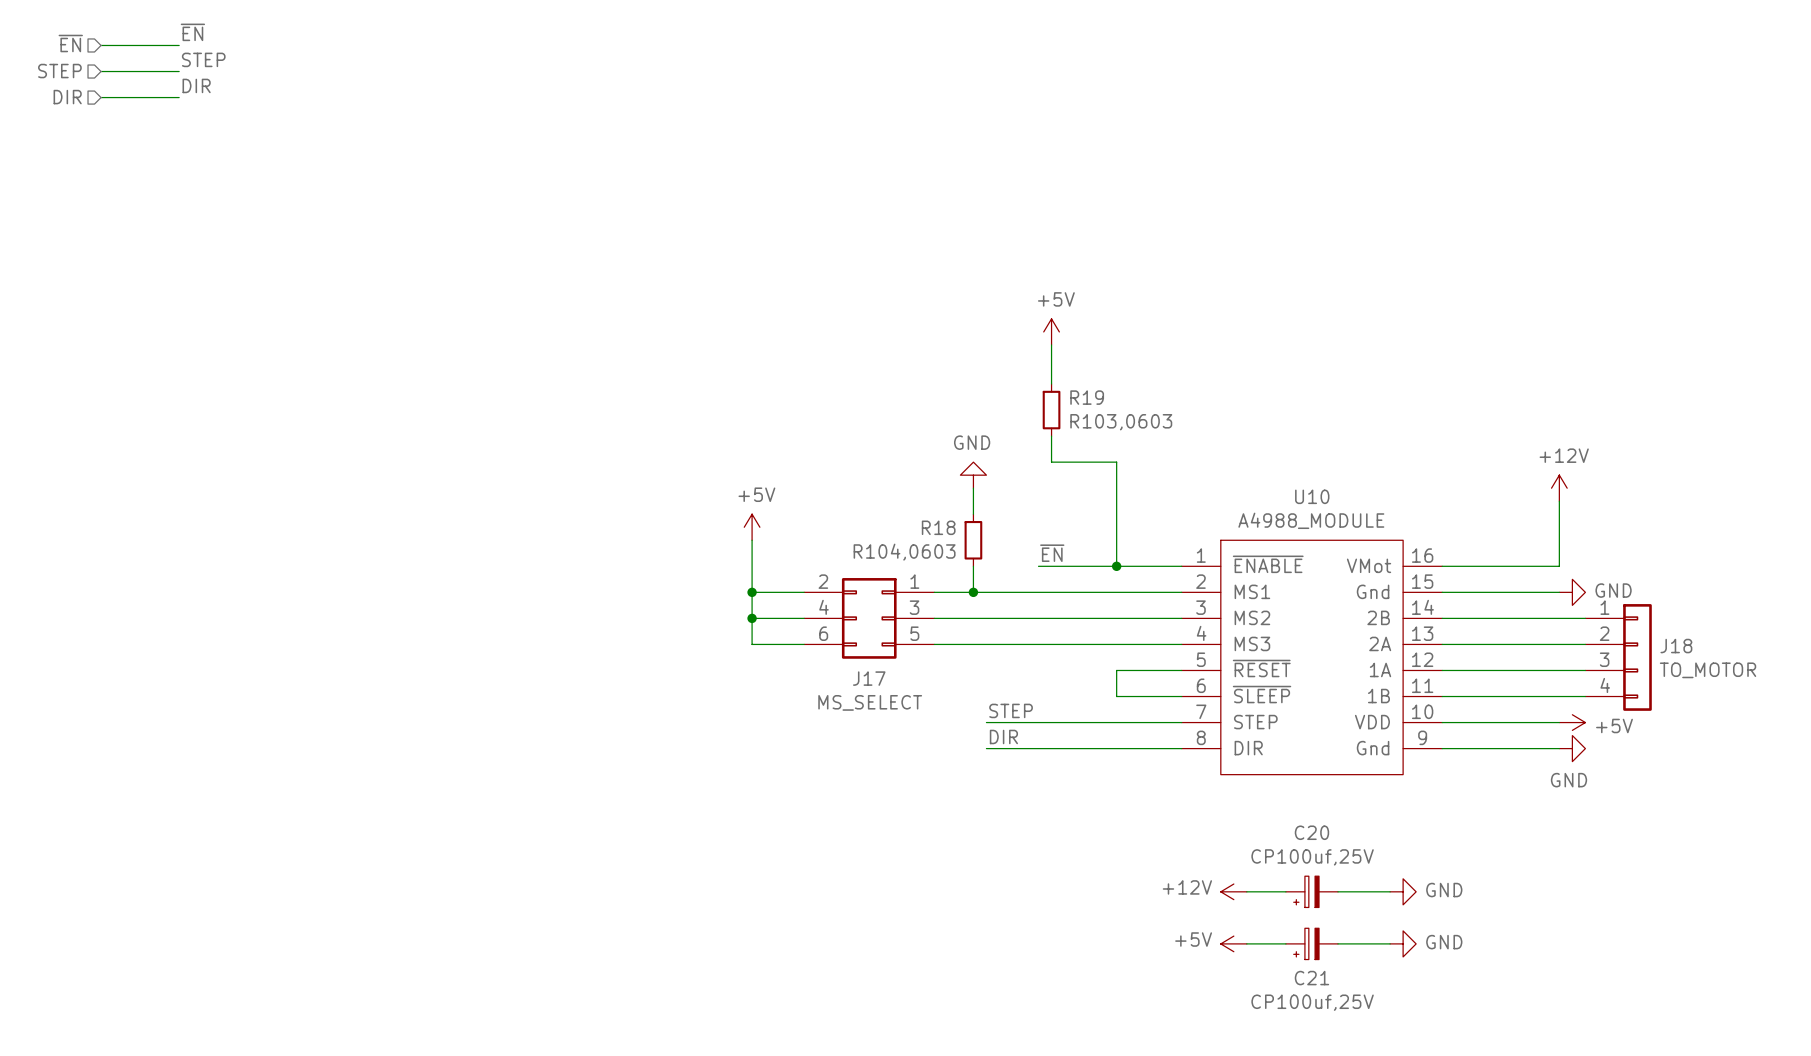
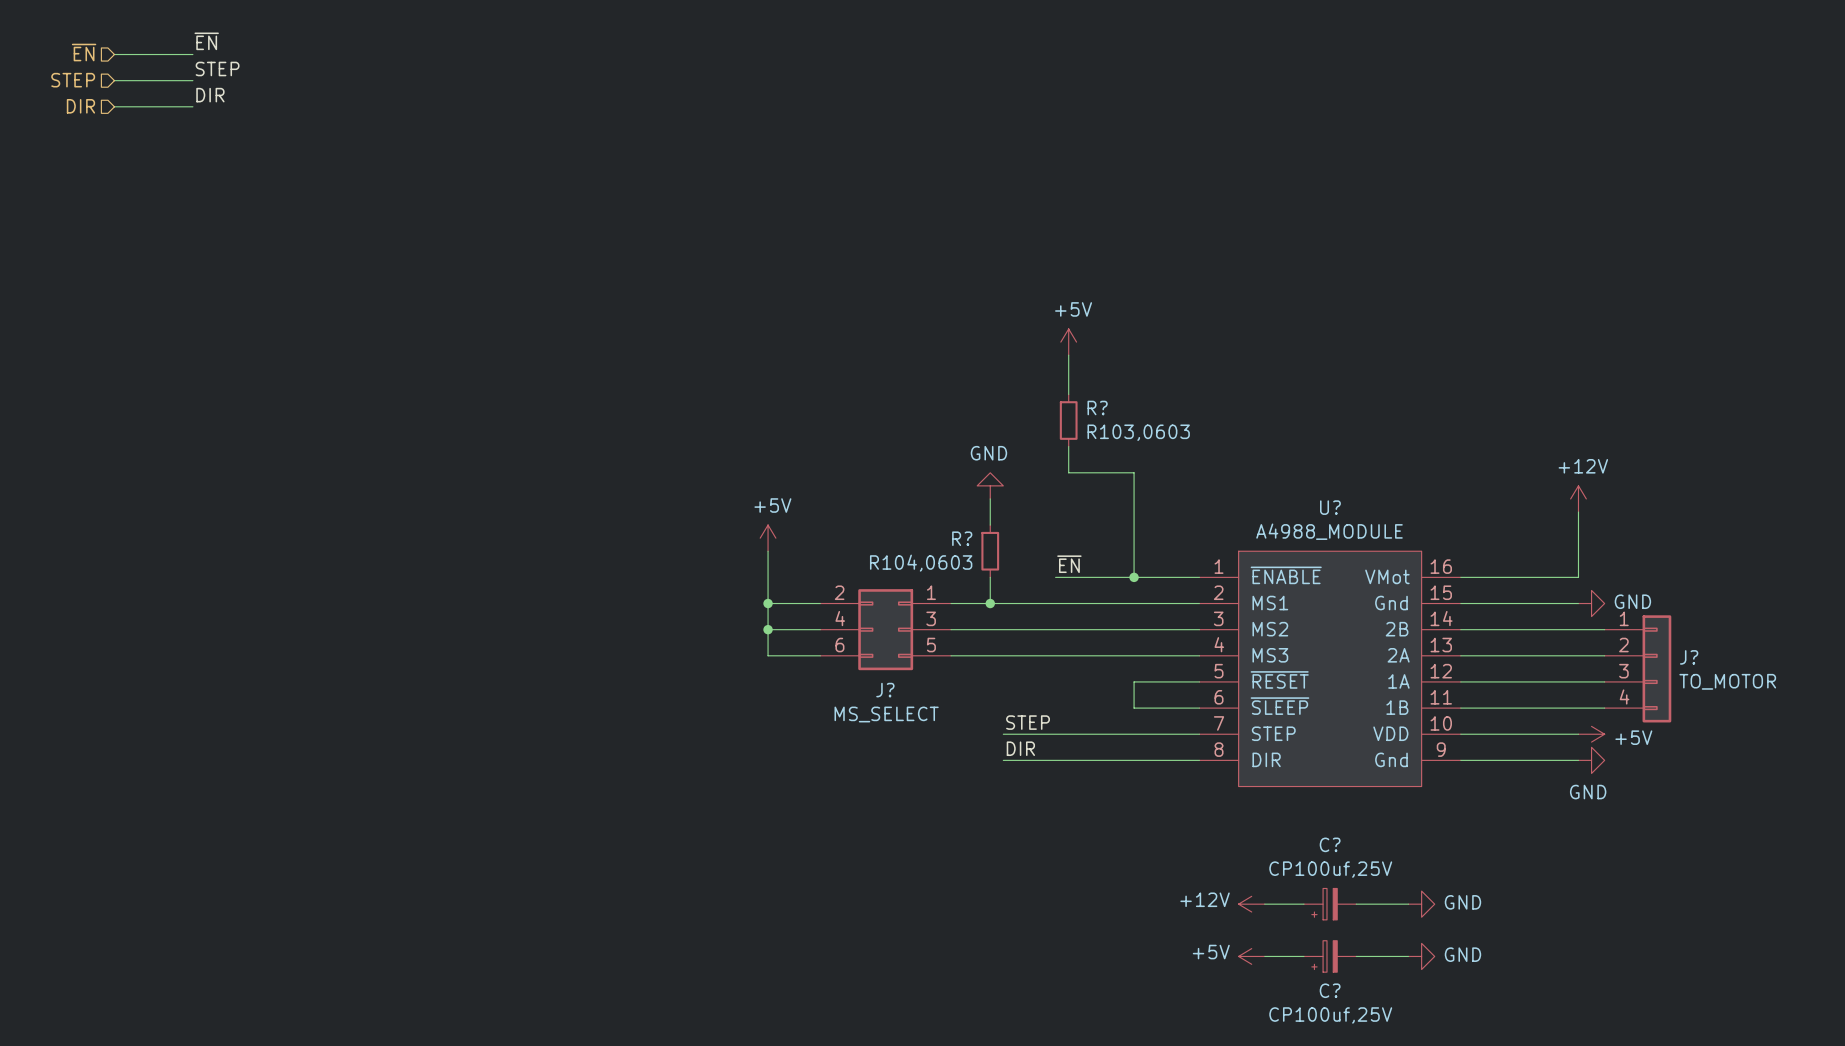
R19 name: R19 (1087, 397) -> R? (1097, 408)
U10 name: U10 (1312, 496) -> U? (1330, 507)
R18 name: R18 (938, 527) -> R? (962, 538)
J18 name: J18 (1676, 646) -> J? (1689, 657)
J17 name: J17 (869, 678) -> J? (885, 690)
C20 name: C20 (1311, 832) -> C? (1330, 844)
C21 name: C21 (1311, 978) -> C? (1330, 990)

